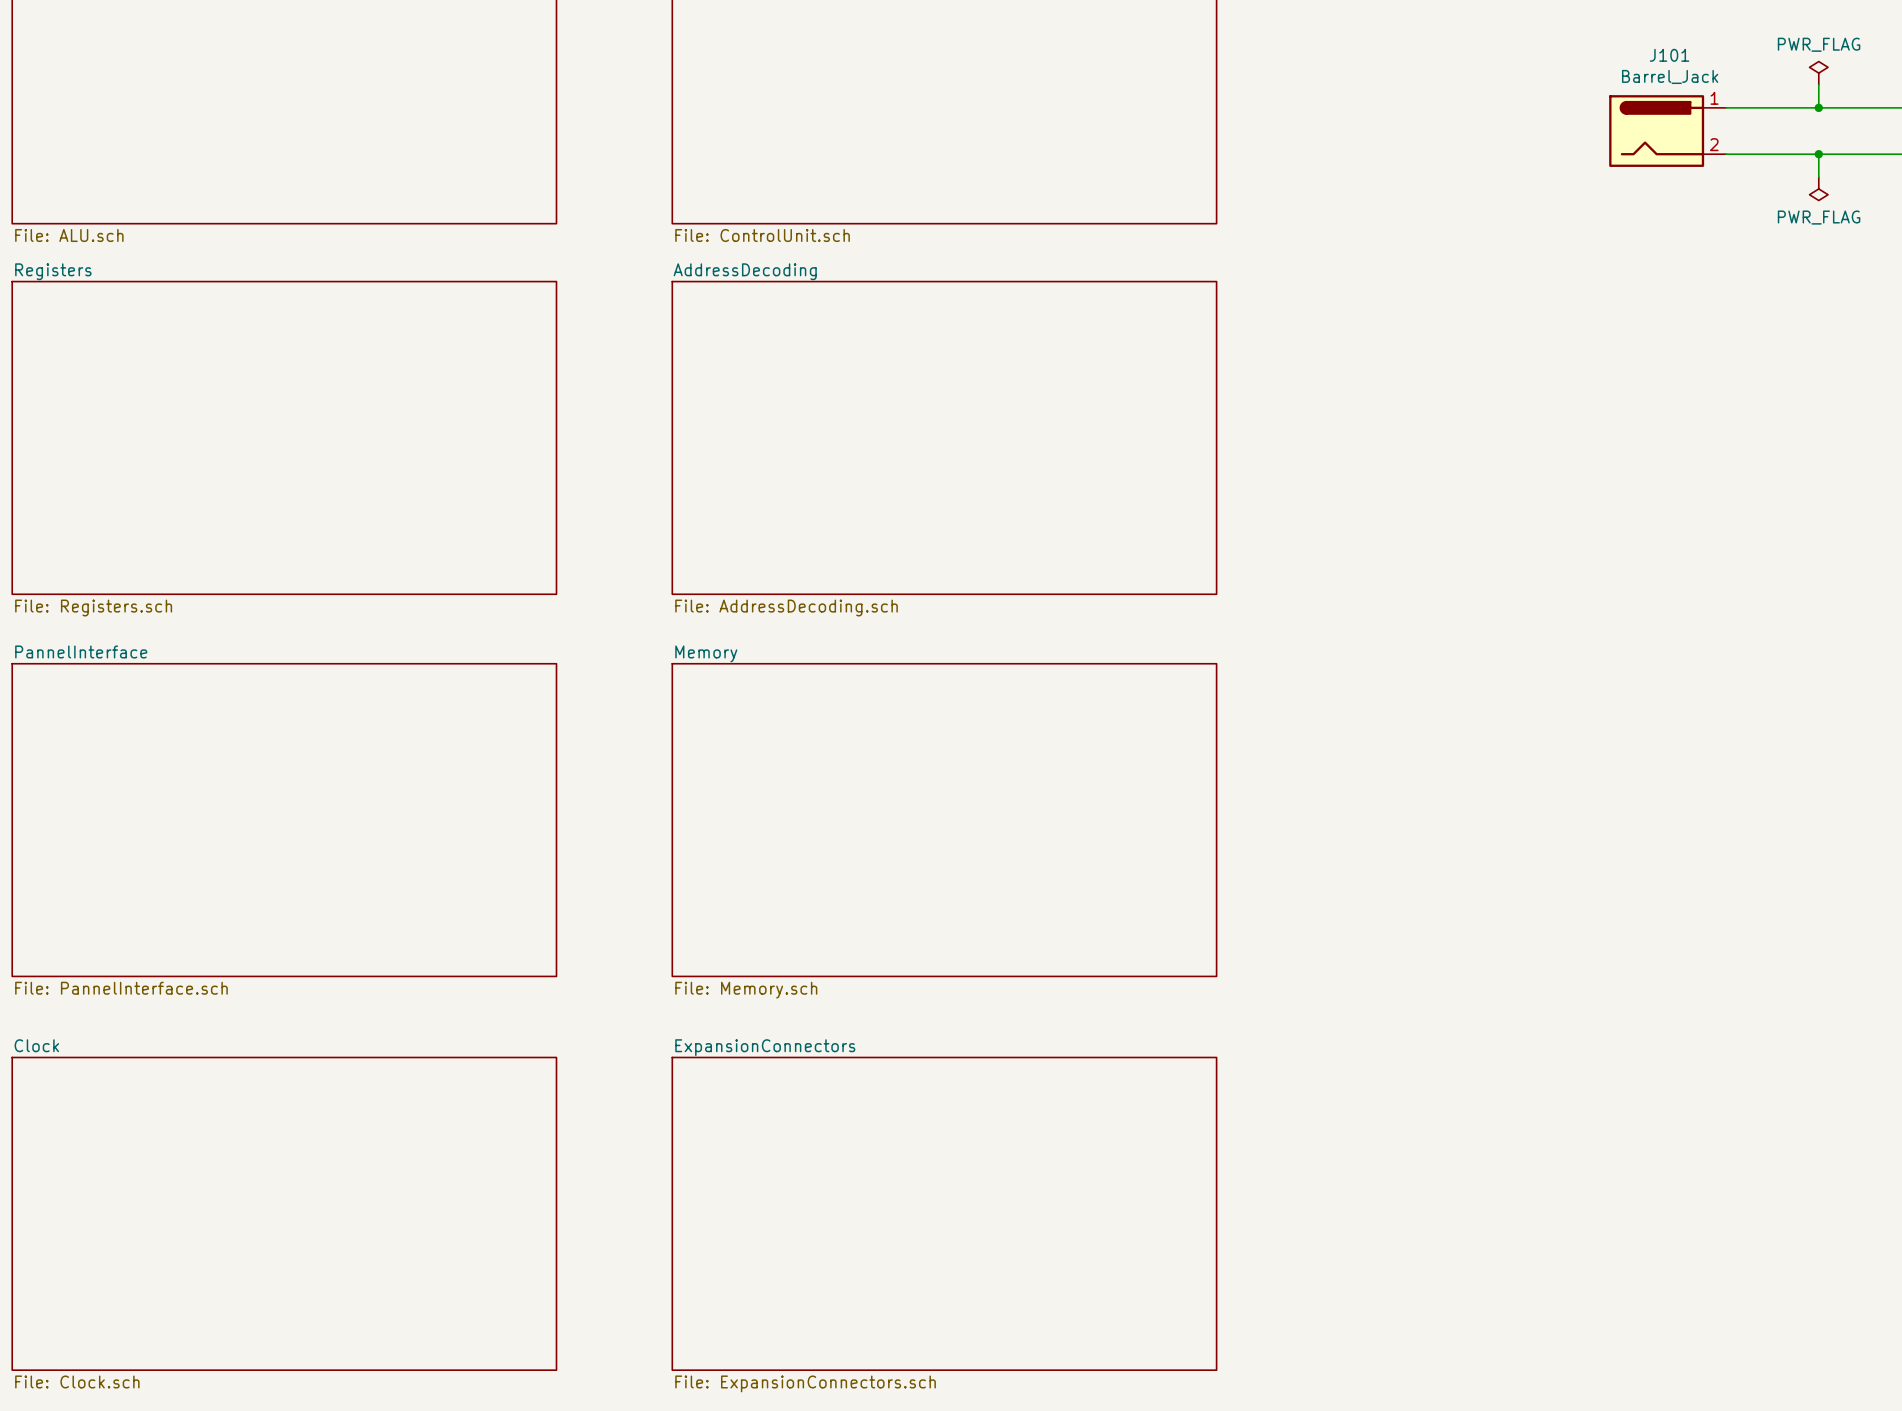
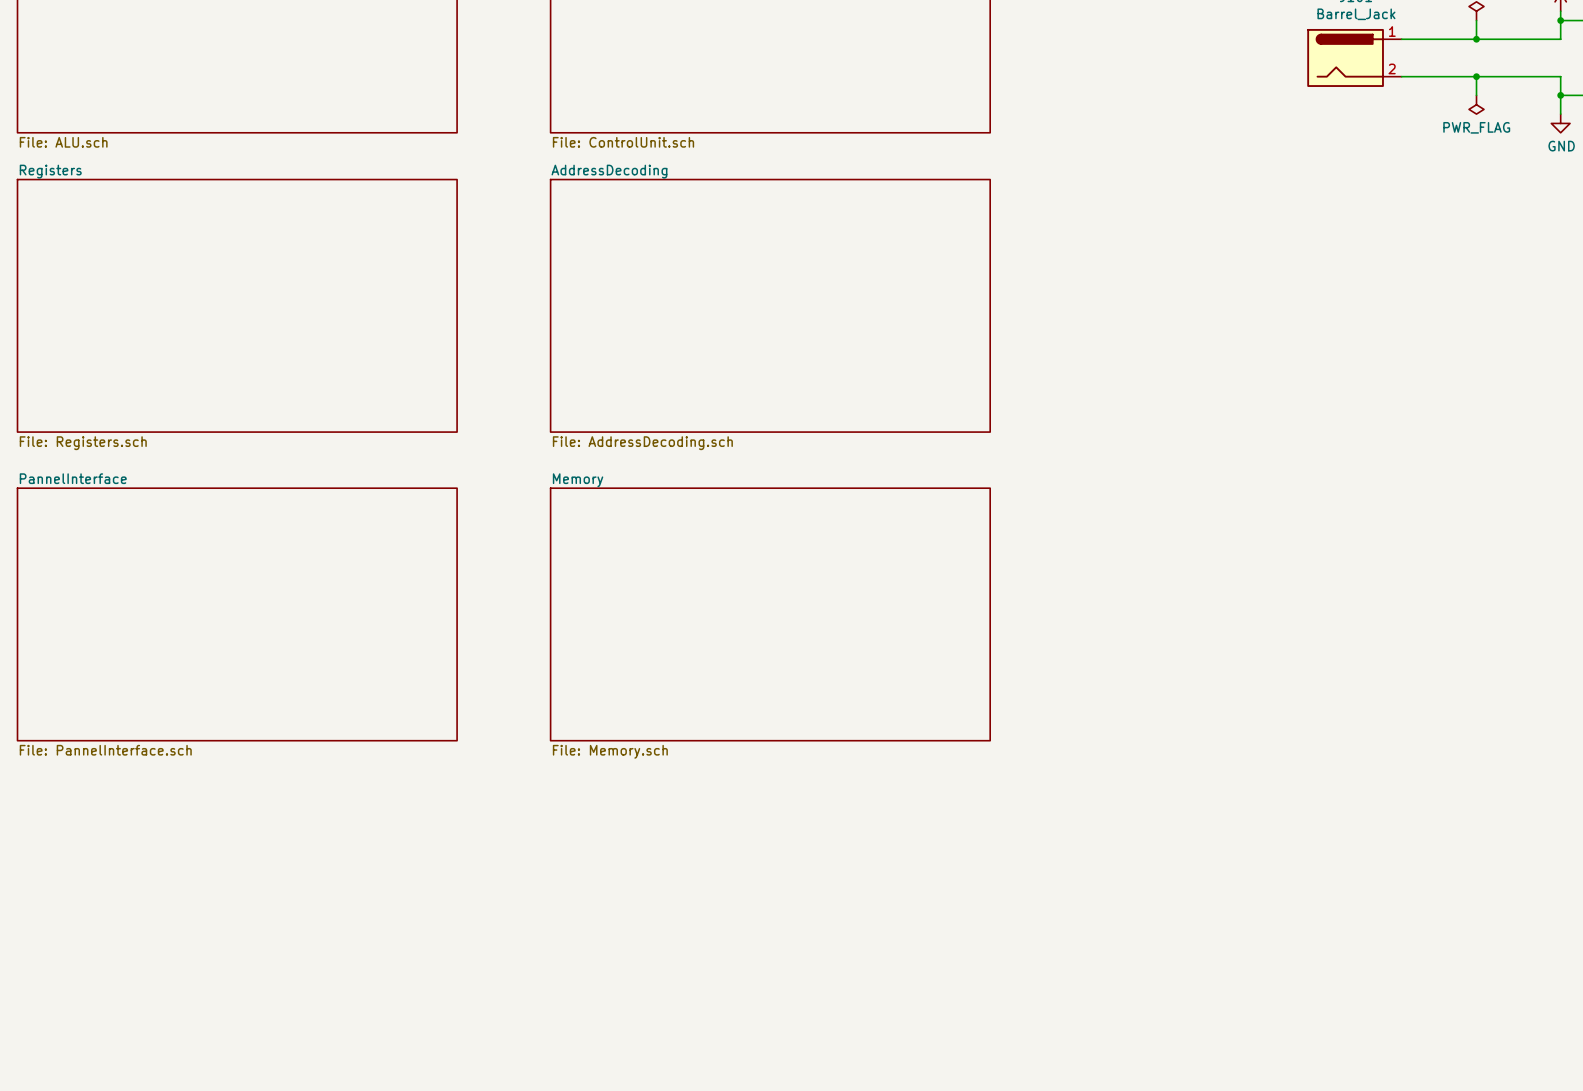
sheet Clock: File: Clock.sch (284, 1213) -> none
sheet ExpansionConnectors: File: ExpansionConnectors.sch (944, 1213) -> none

